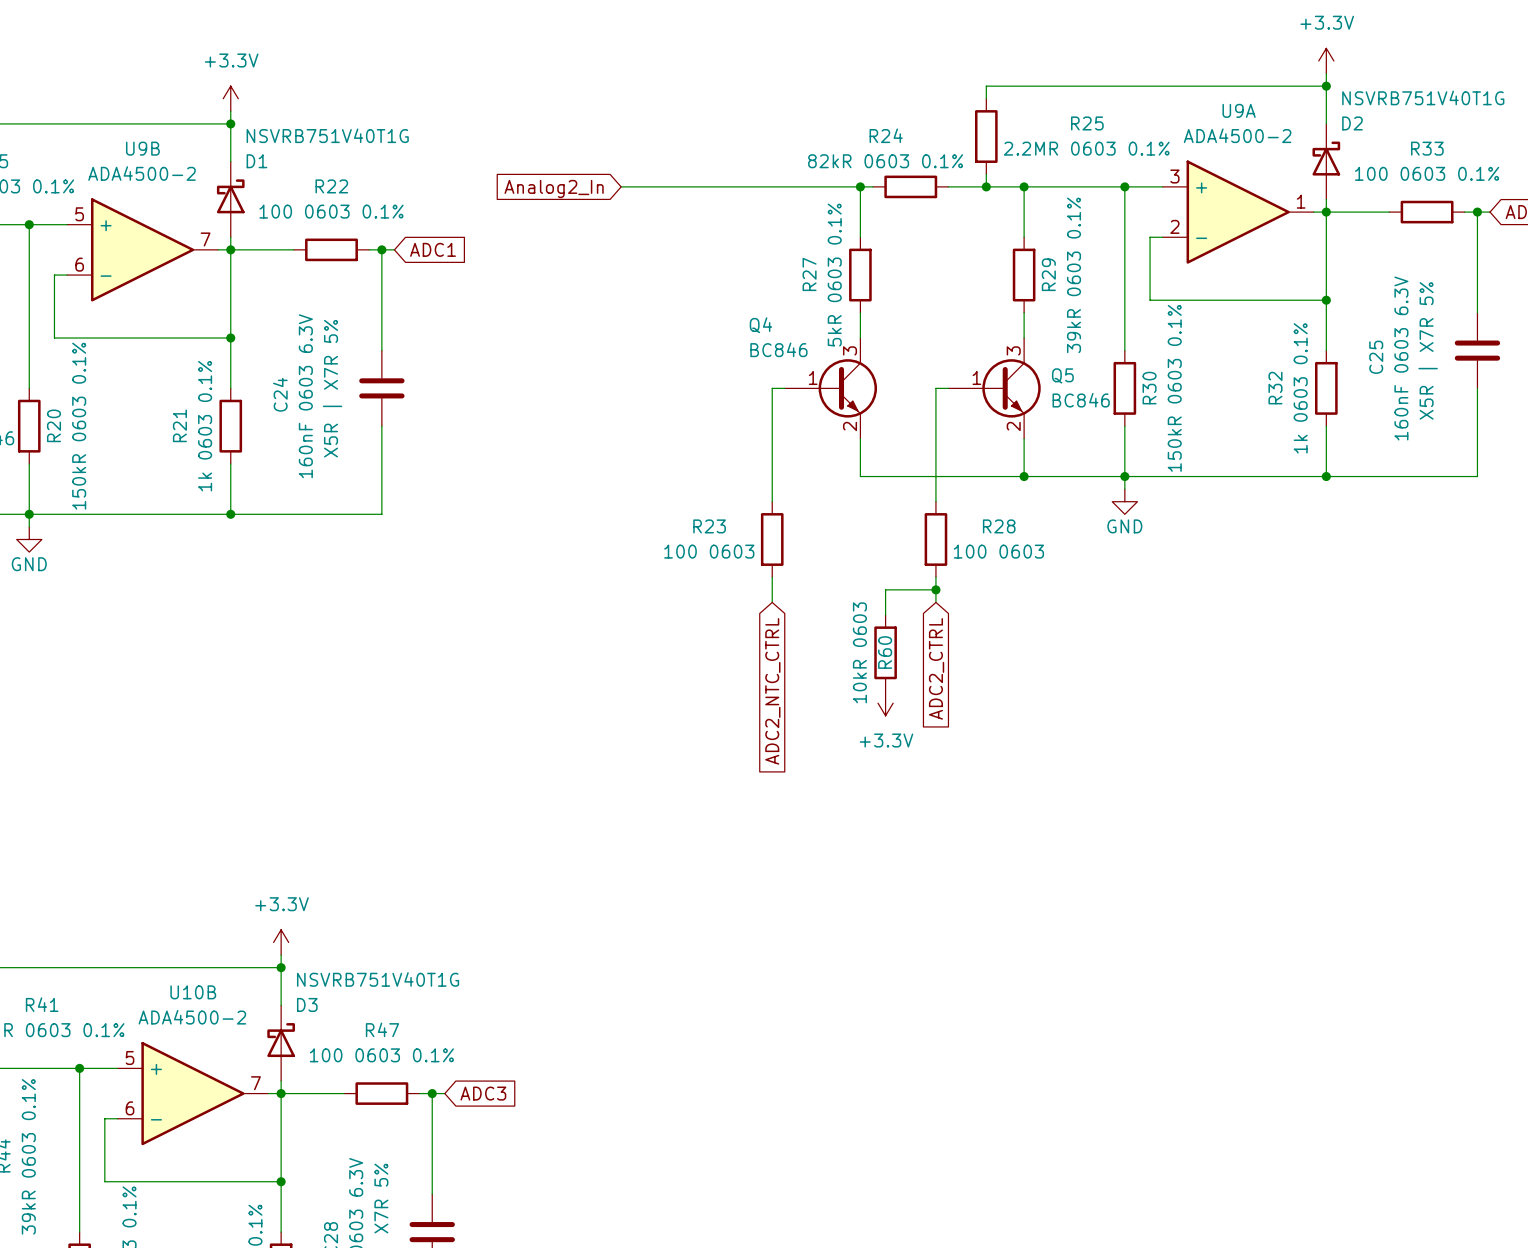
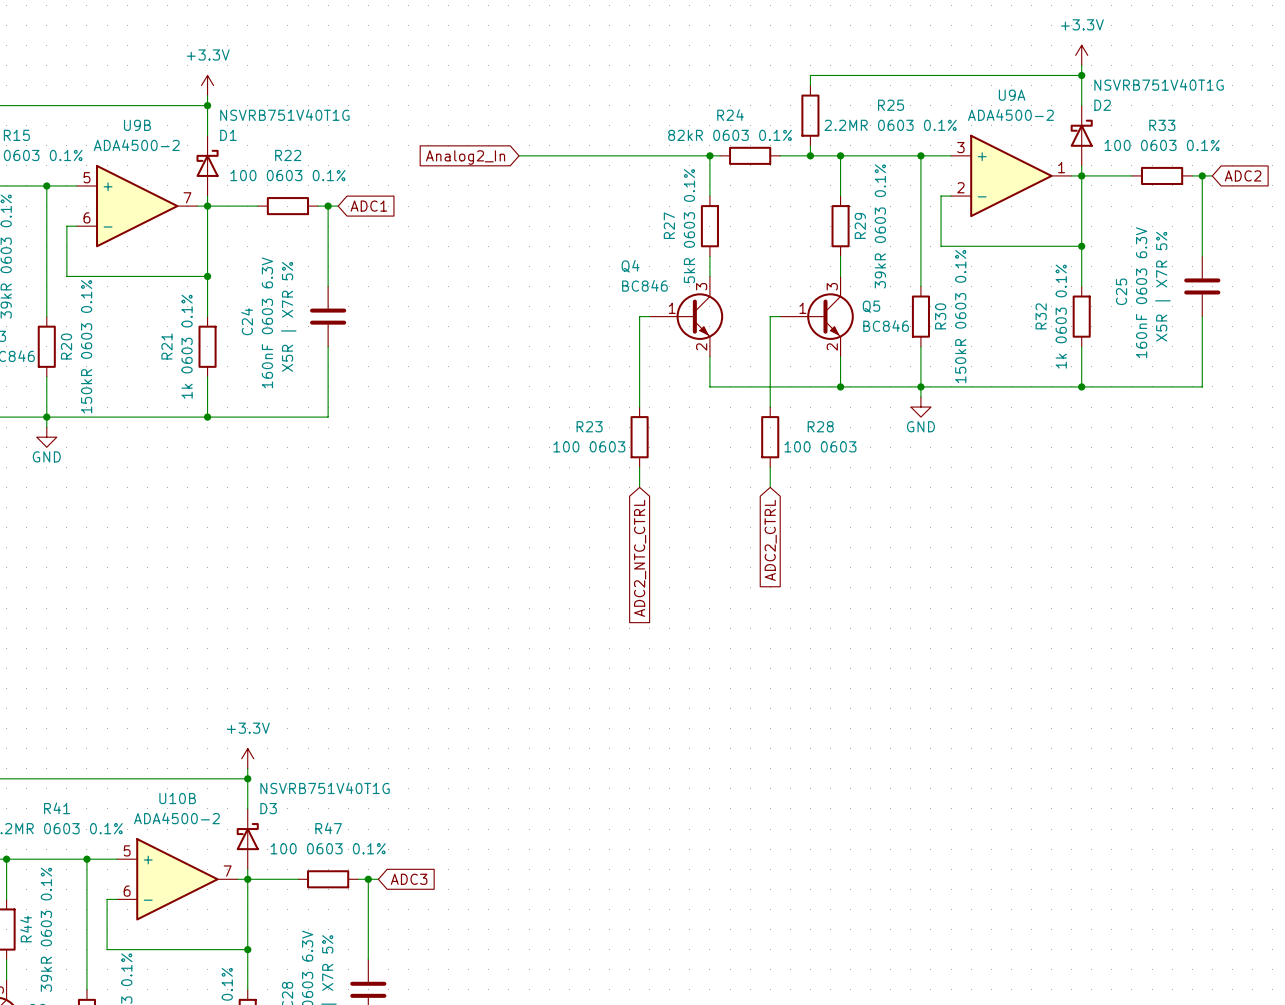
wire: (935, 589) (885, 589) (885, 615) -> none
junction: (935, 589) -> none
R60: 10kR 0603 (885, 652) -> none
power symbol: +3.3V (885, 703) -> none

